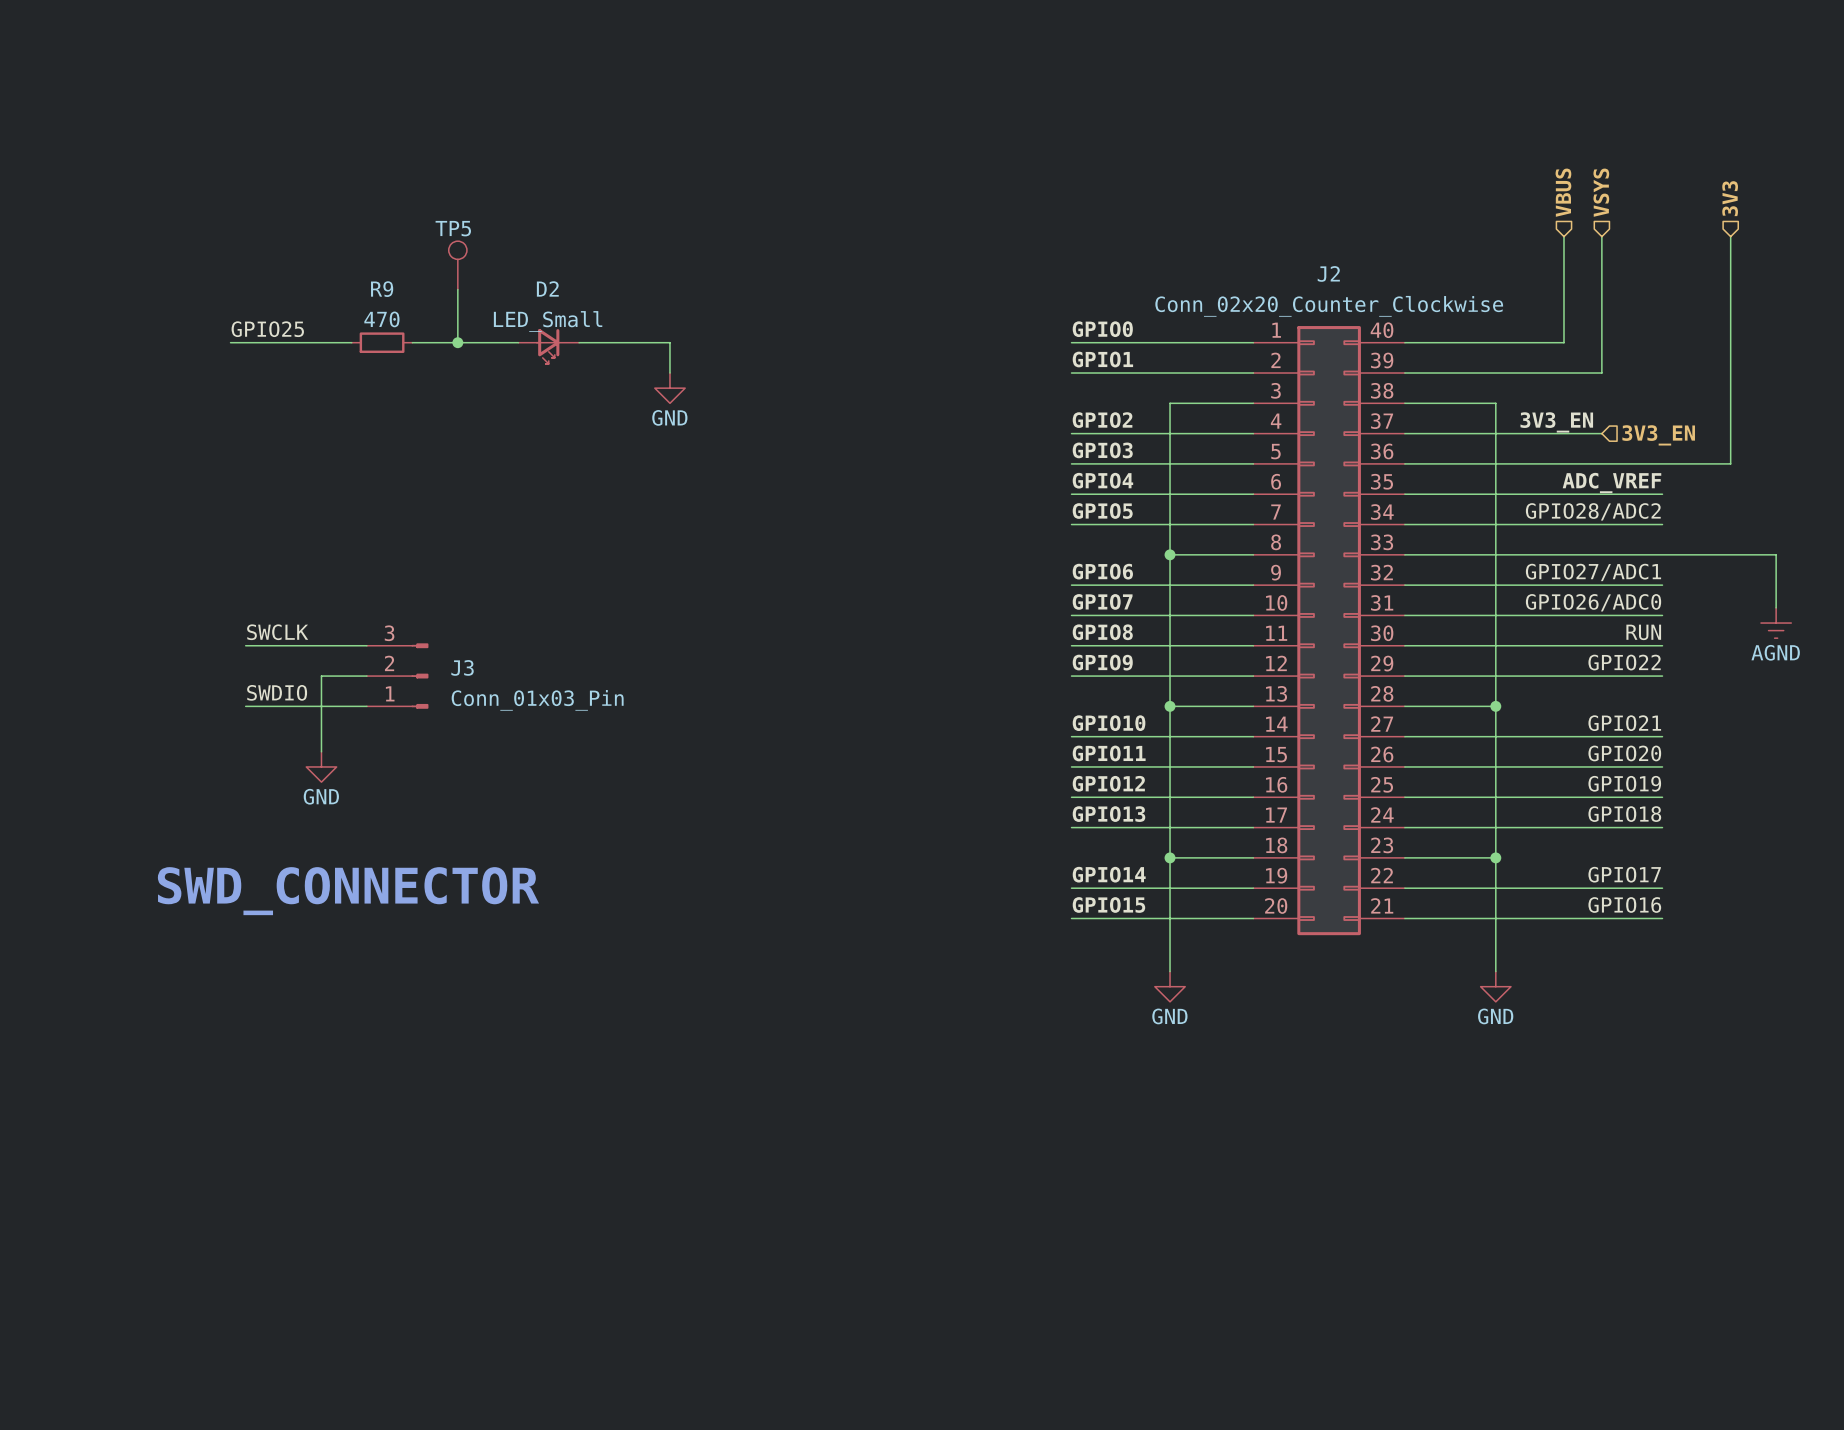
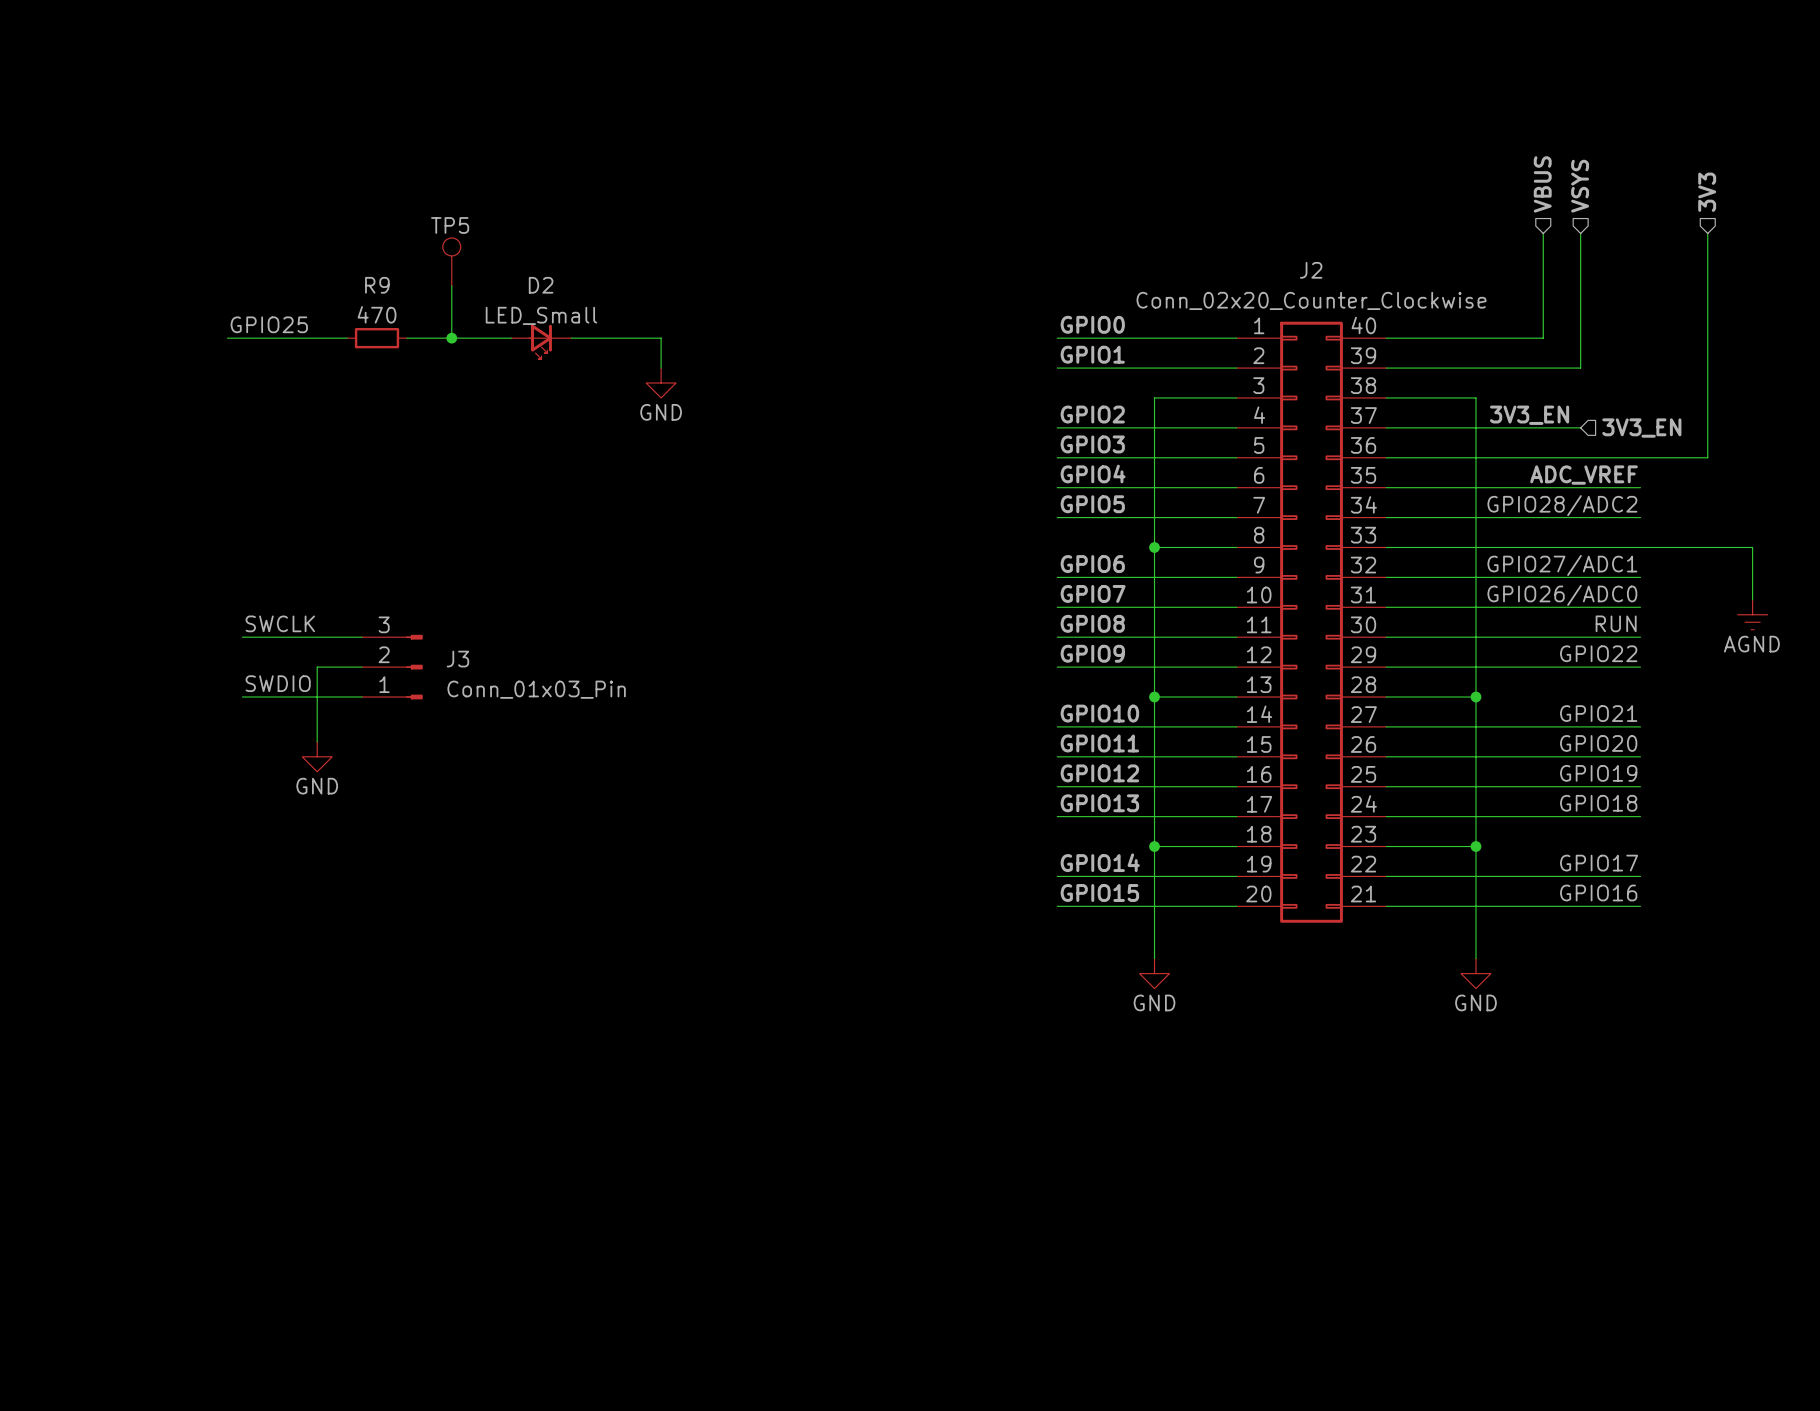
text: SWD_CONNECTOR (348, 891) -> none

